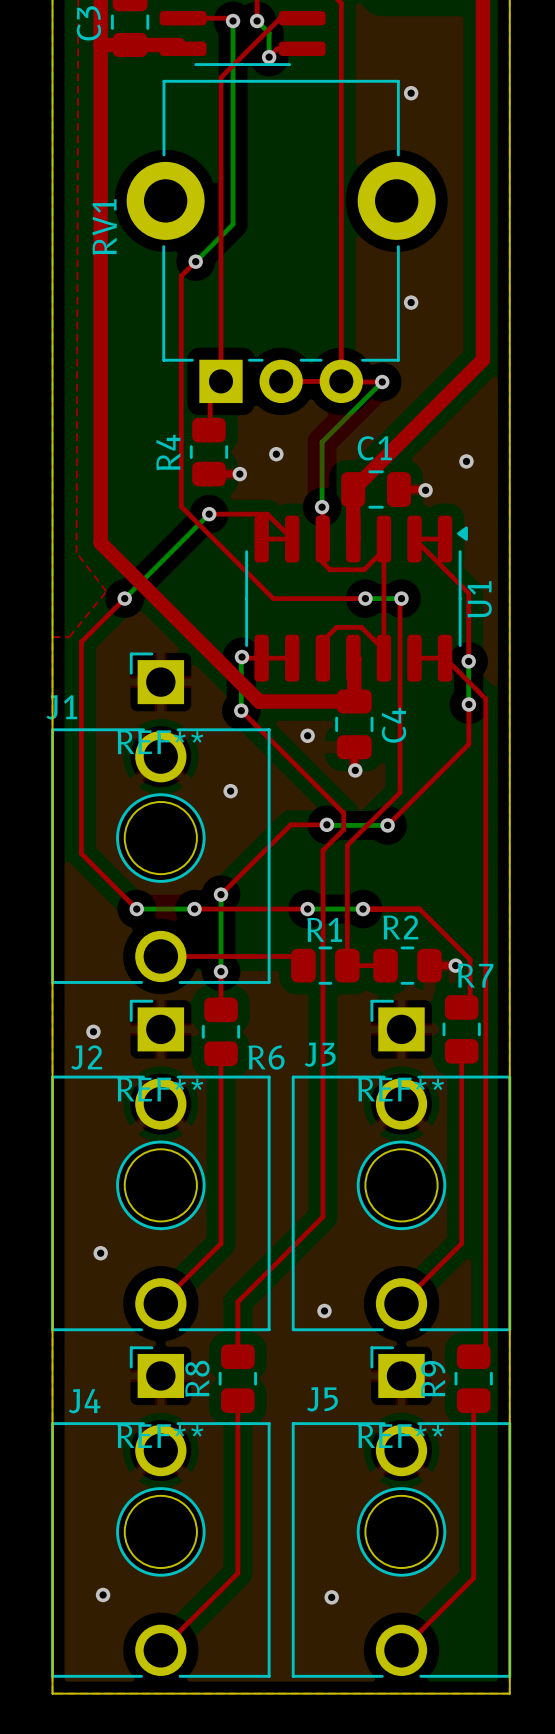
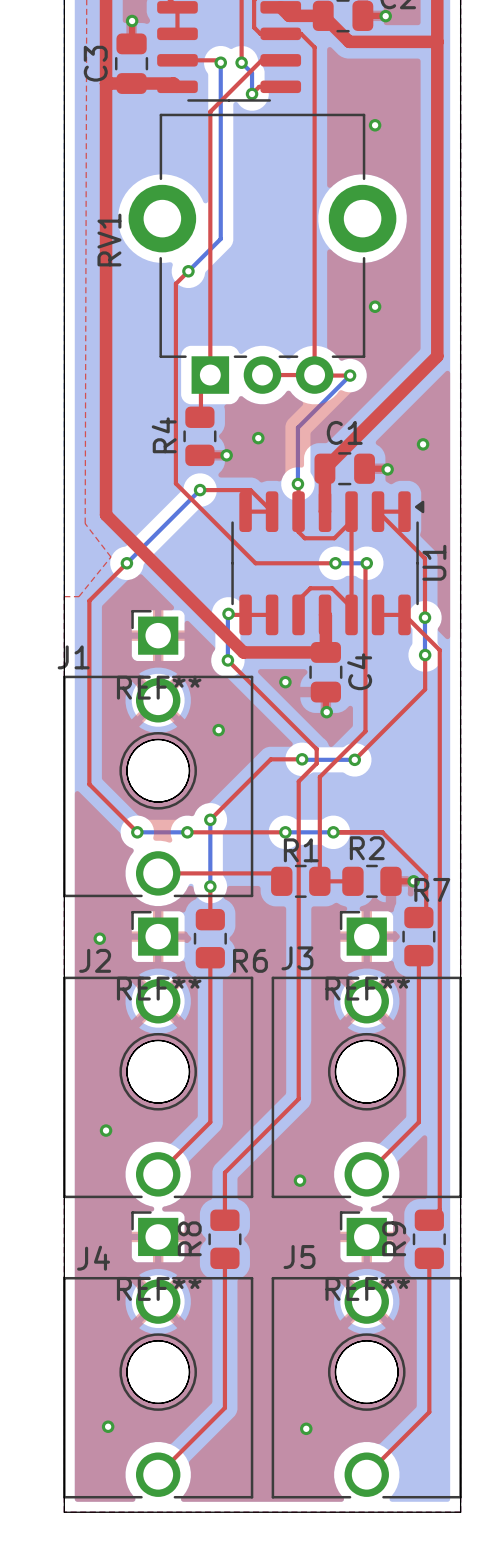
J1 footprint: [51, 652, 271, 984] -> [63, 609, 254, 898]
J2 footprint: [51, 999, 271, 1332] -> [63, 910, 254, 1199]
J3 footprint: [291, 999, 512, 1332] -> [271, 910, 462, 1199]
J4 footprint: [51, 1346, 271, 1678] -> [63, 1211, 254, 1499]
J5 footprint: [291, 1346, 512, 1678] -> [271, 1211, 462, 1499]

